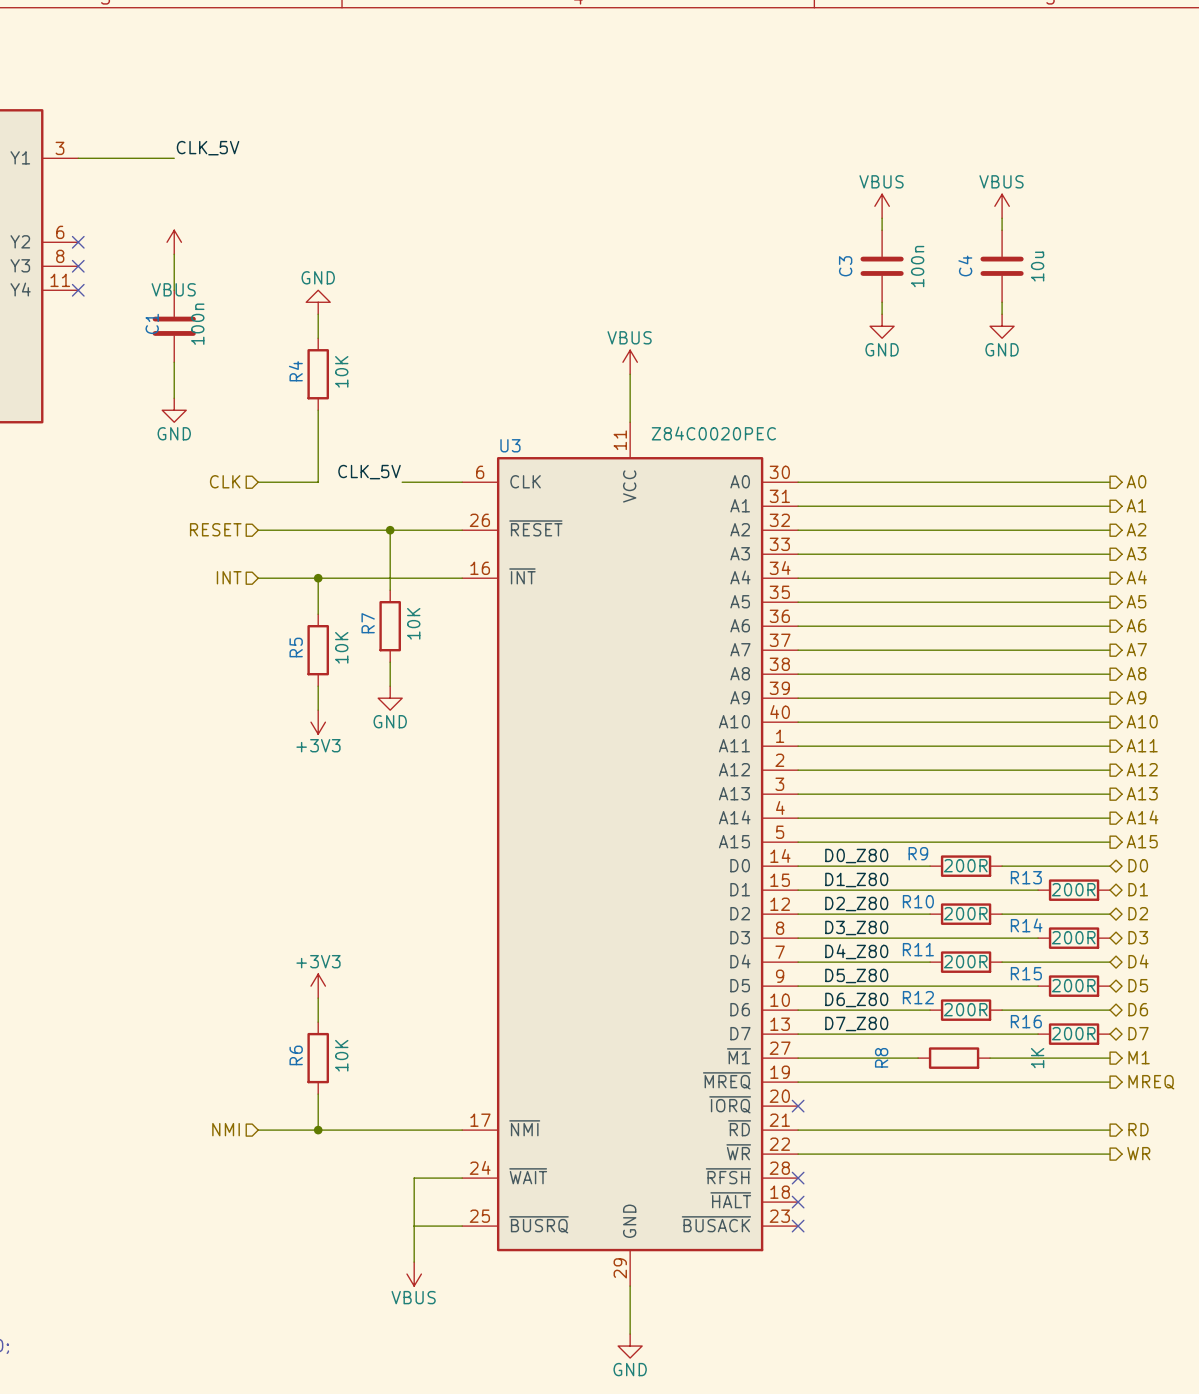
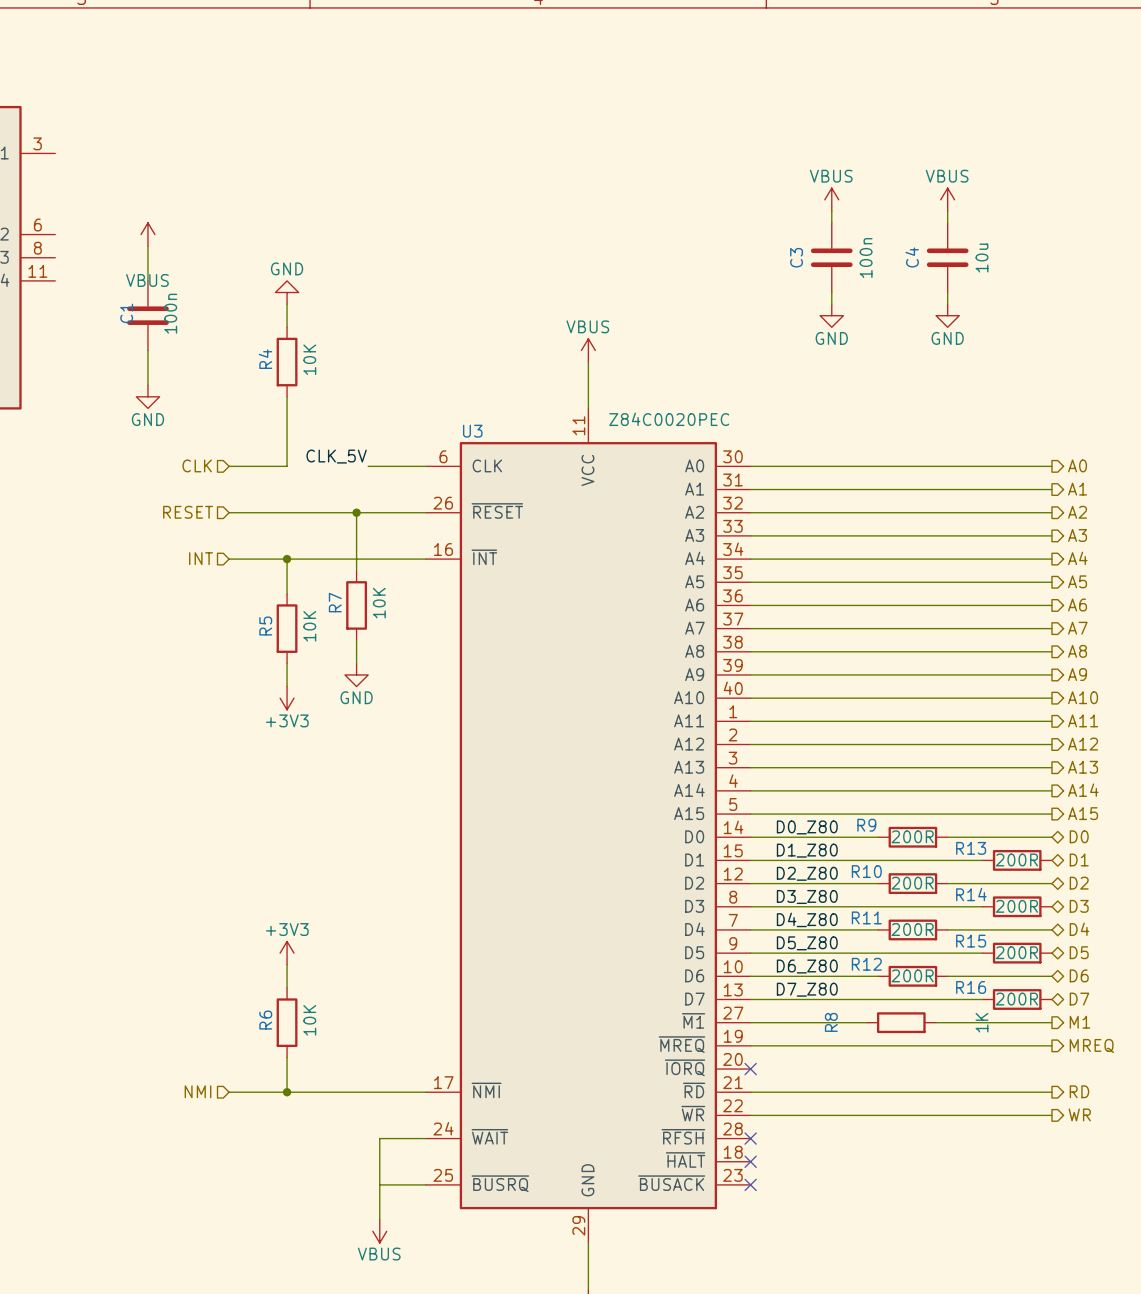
label: CLK_5V (208, 148) -> none
wire: (78, 158) (174, 158) -> none
no-connect mark: (78, 242) -> none
no-connect mark: (78, 266) -> none
no-connect mark: (78, 290) -> none

